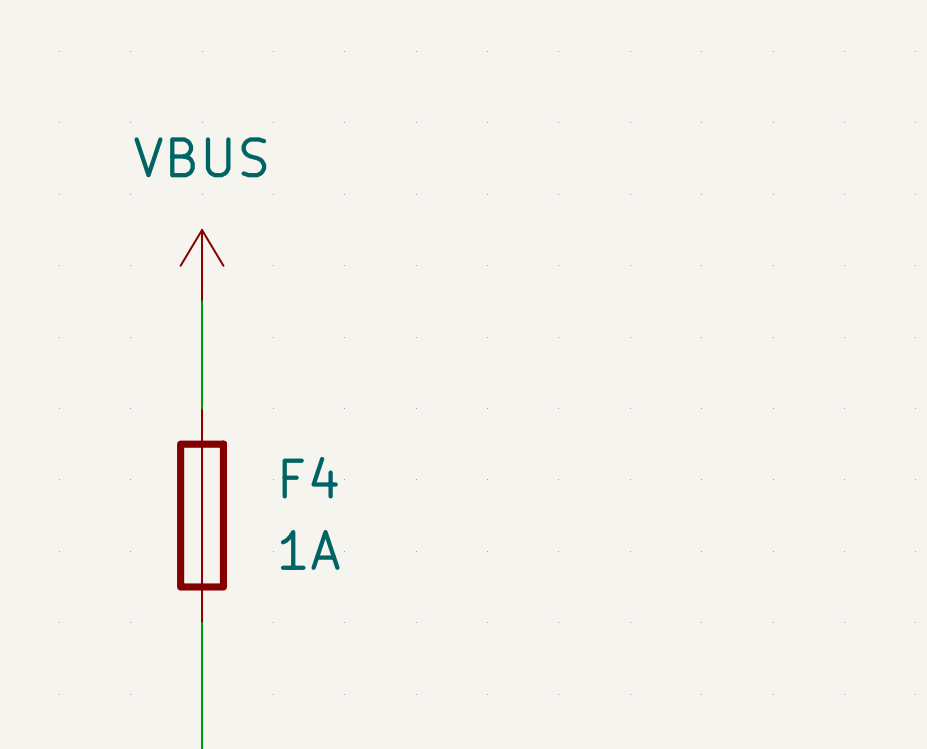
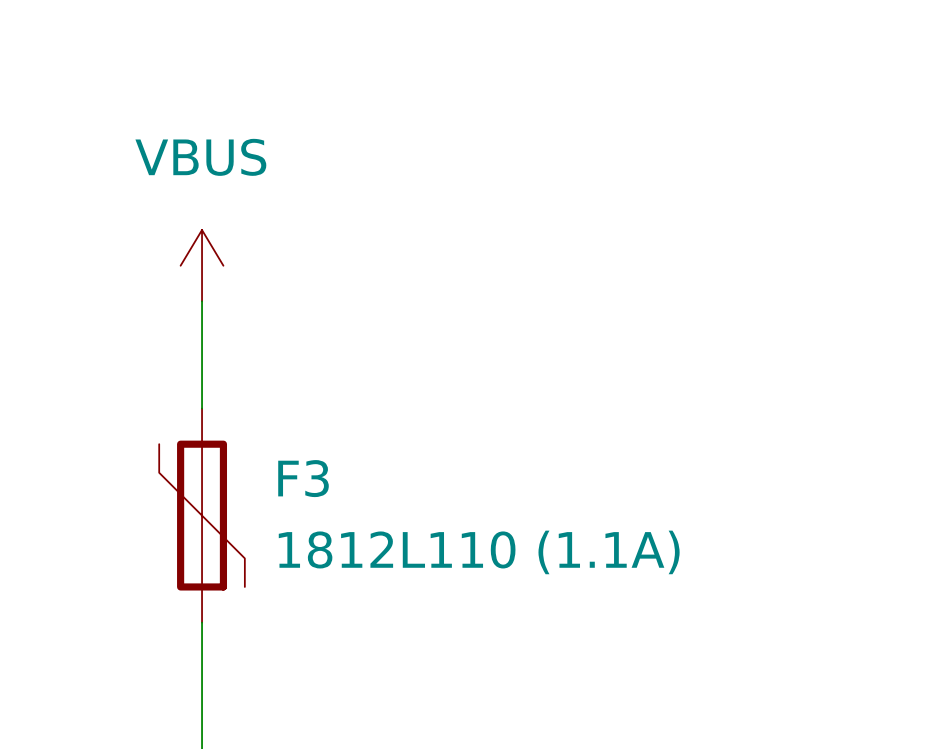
F4: 1A (202, 515) -> none
F3: none -> 1812L110 (1.1A) (202, 515)

